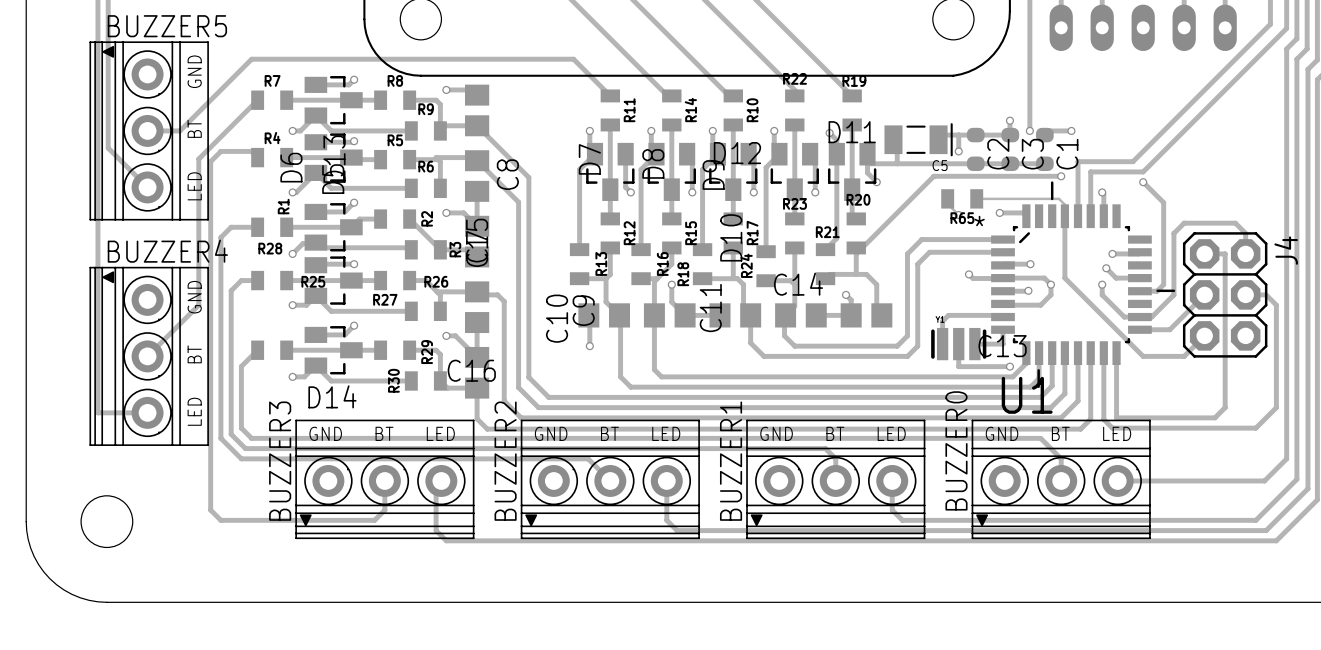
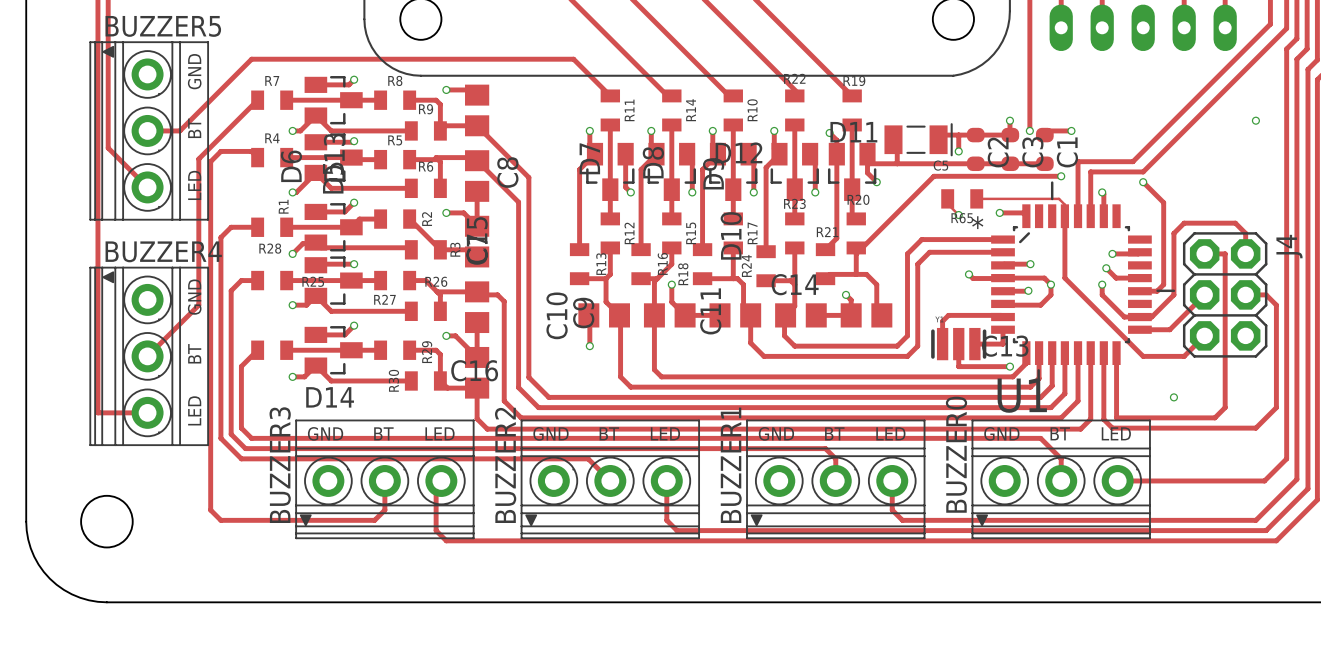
via: none -> (1255, 120)
via: none -> (1173, 397)

